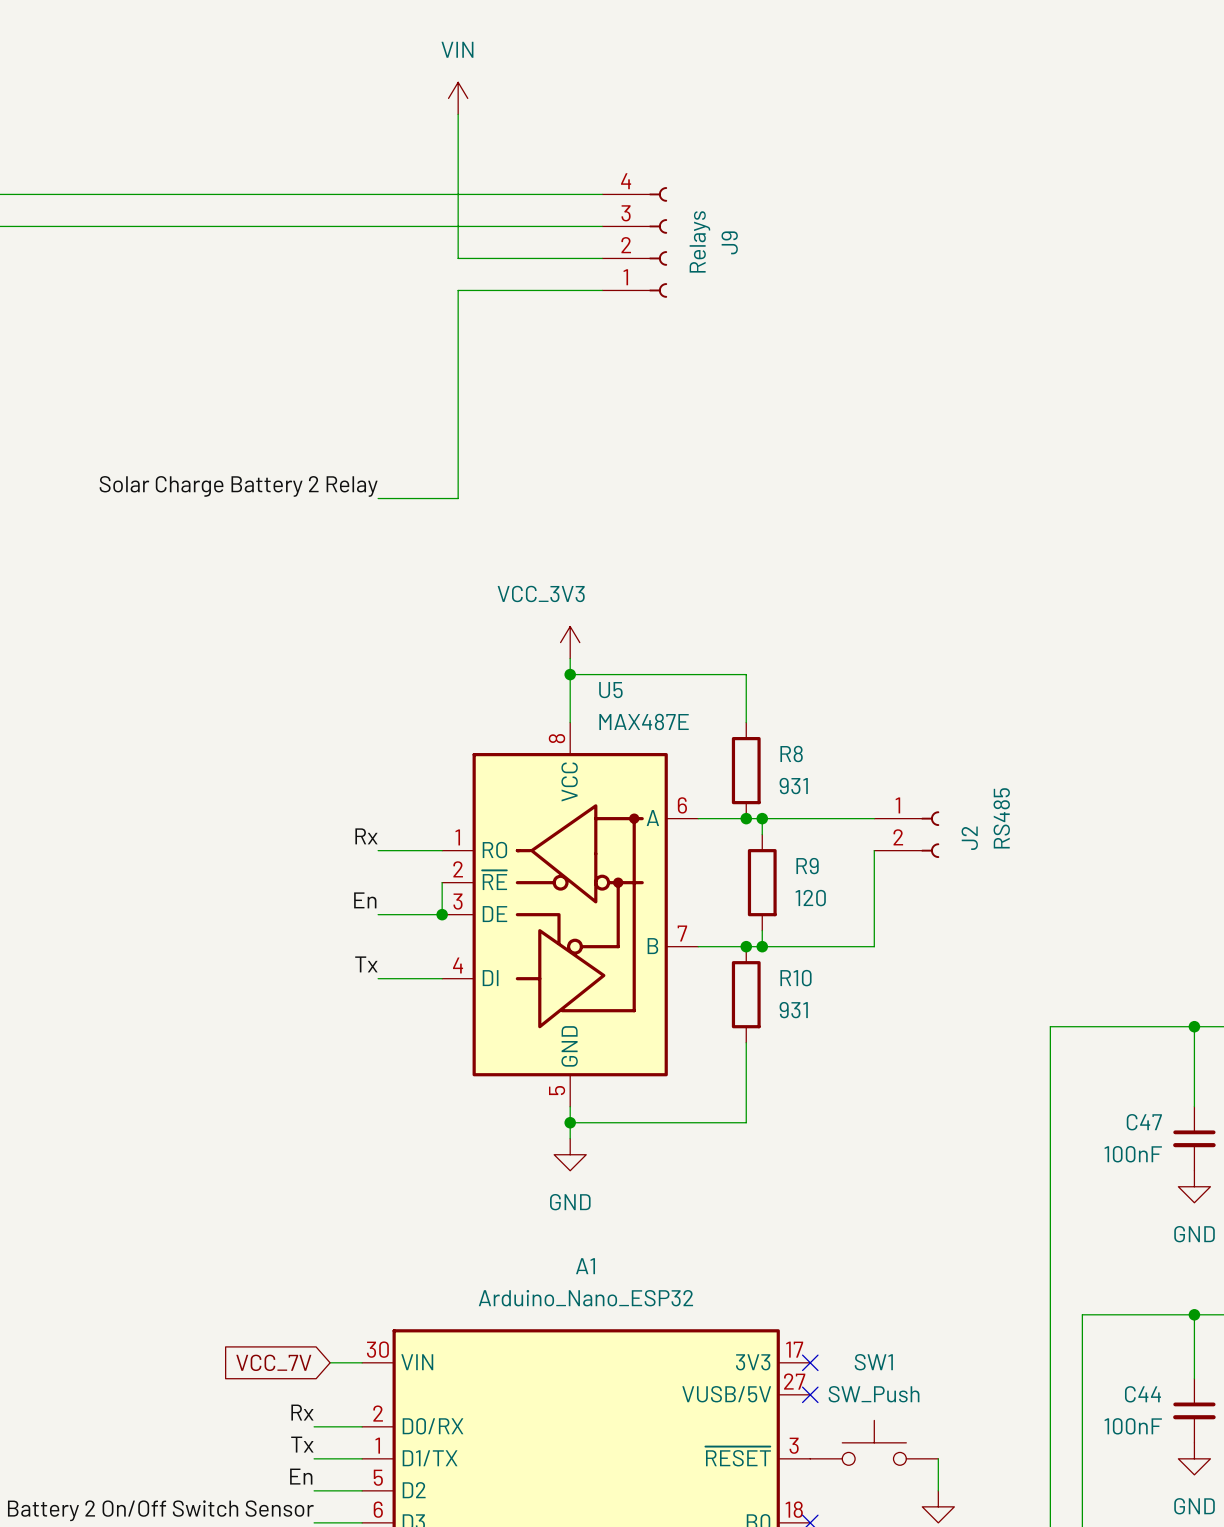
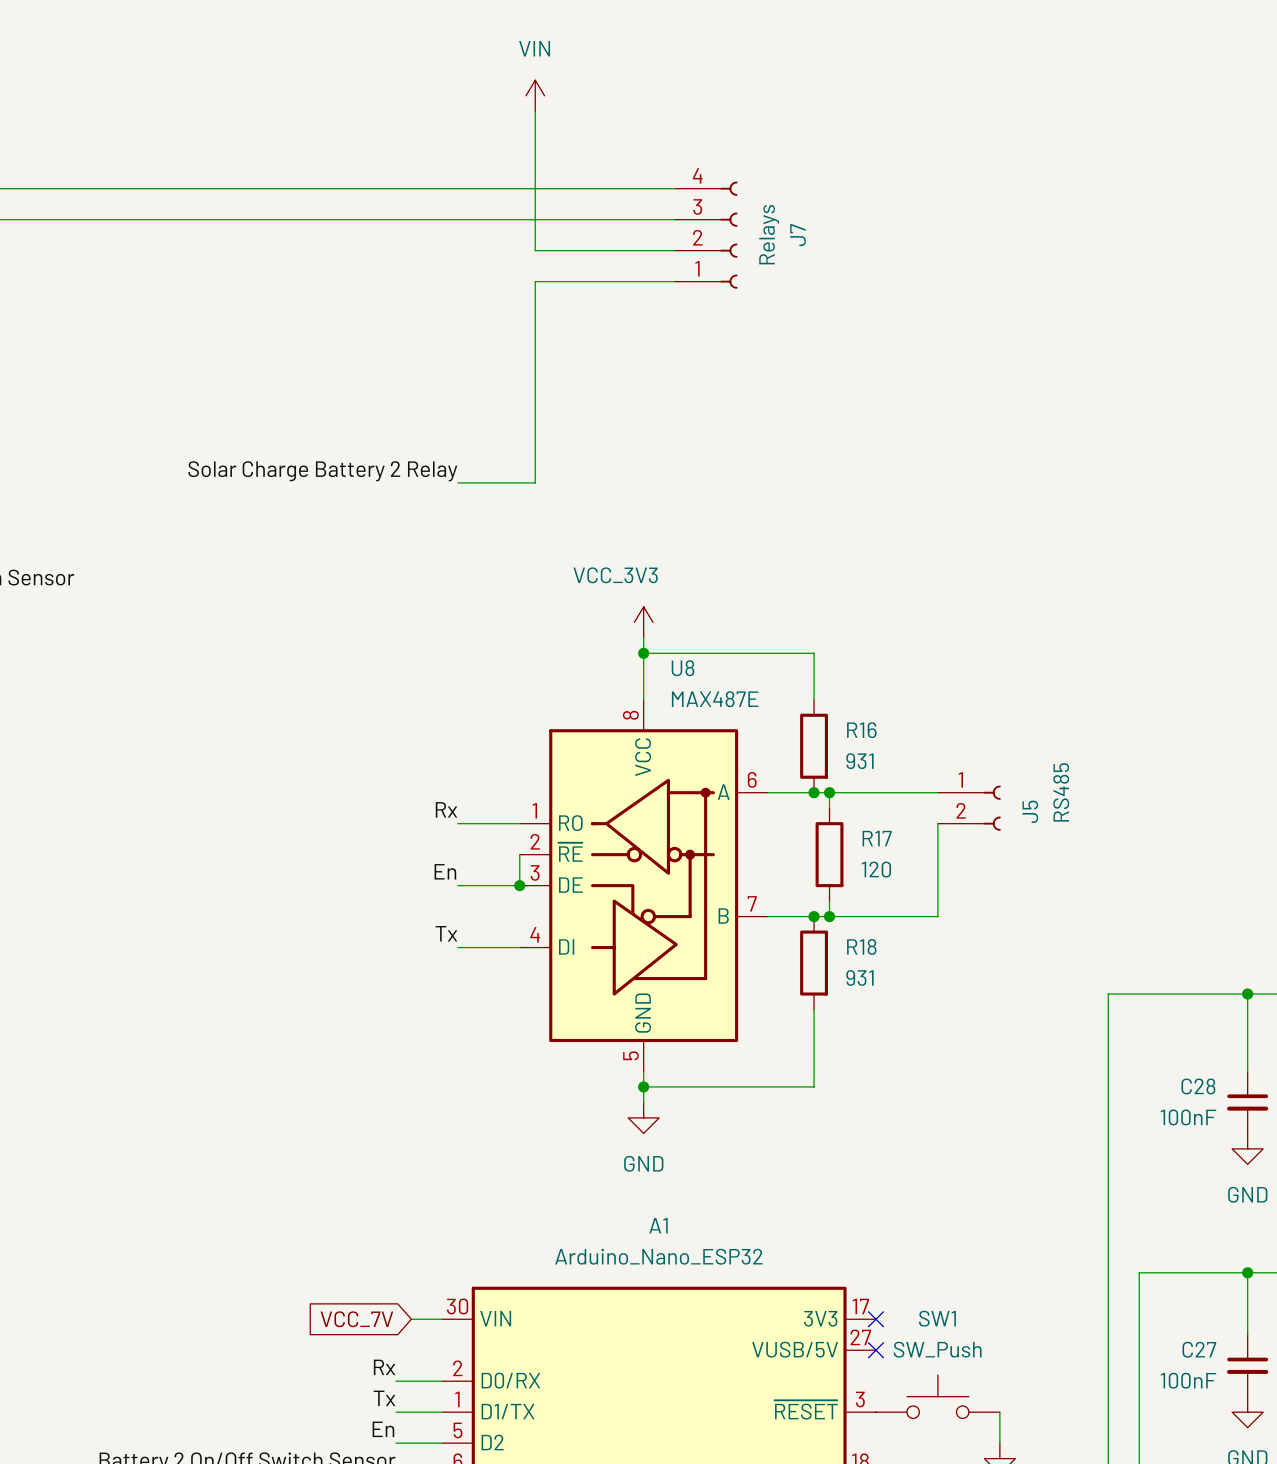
J9 name: J9 (729, 242) -> J7 (798, 235)
U5 name: U5 (610, 690) -> U8 (683, 668)
R8 name: R8 (791, 753) -> R16 (861, 730)
J2 name: J2 (969, 838) -> J5 (1030, 811)
R9 name: R9 (807, 866) -> R17 (877, 838)
R10 name: R10 (795, 978) -> R18 (861, 946)
C47 name: C47 (1144, 1122) -> C28 (1198, 1086)
C44 name: C44 (1142, 1394) -> C27 (1199, 1349)

